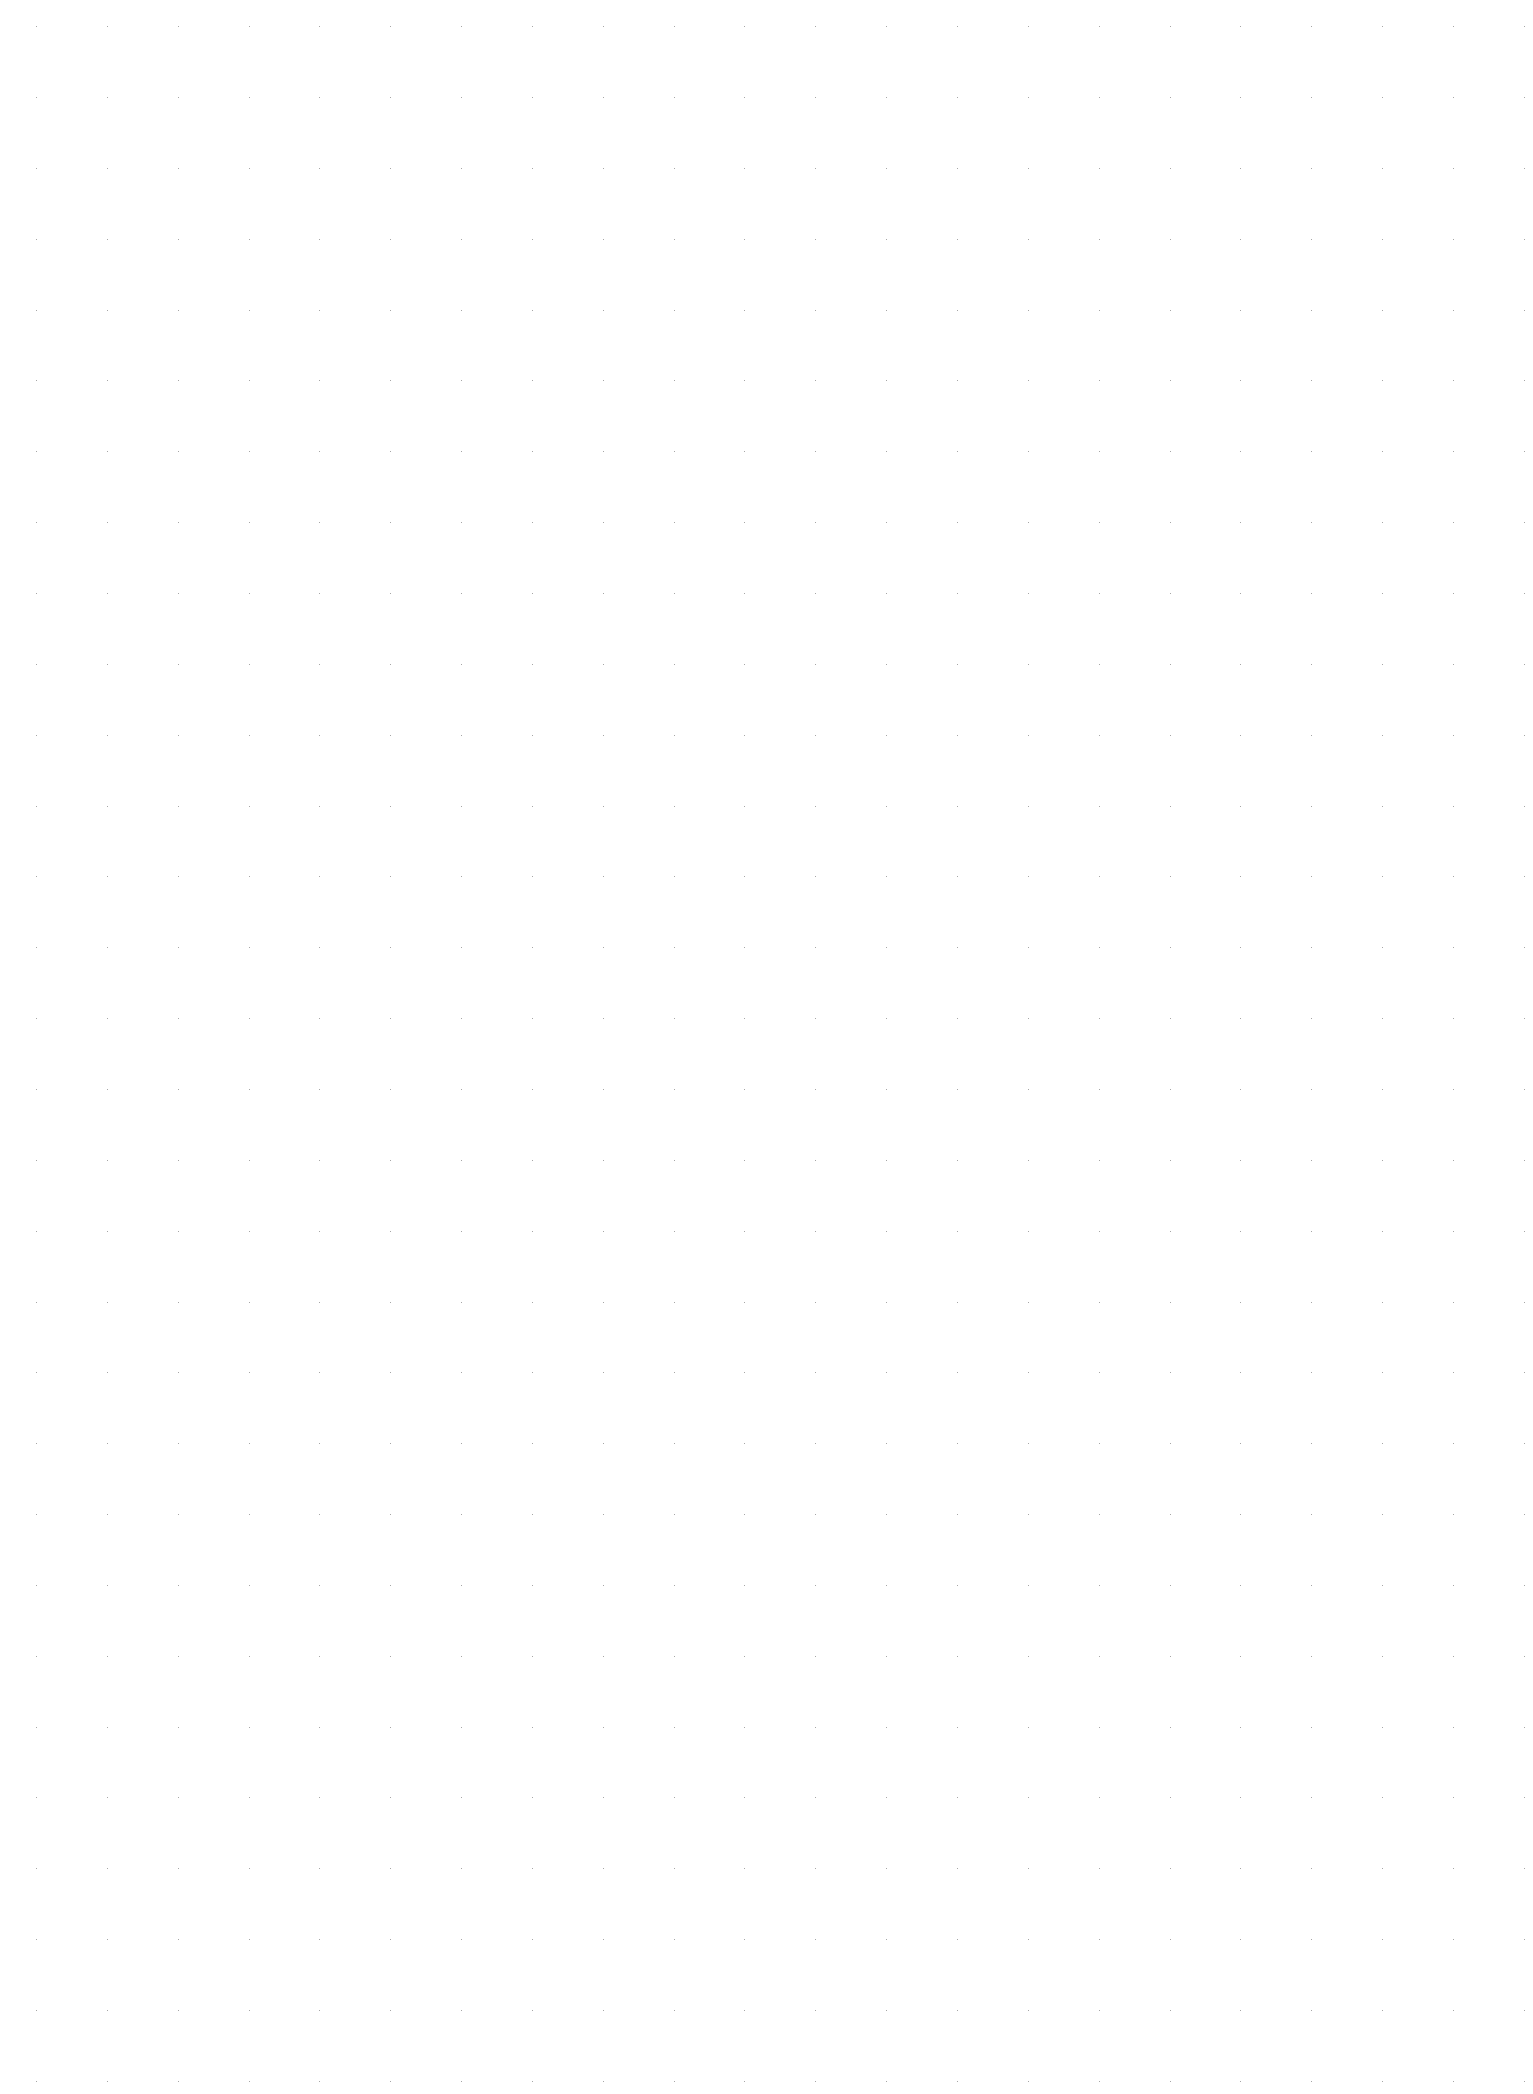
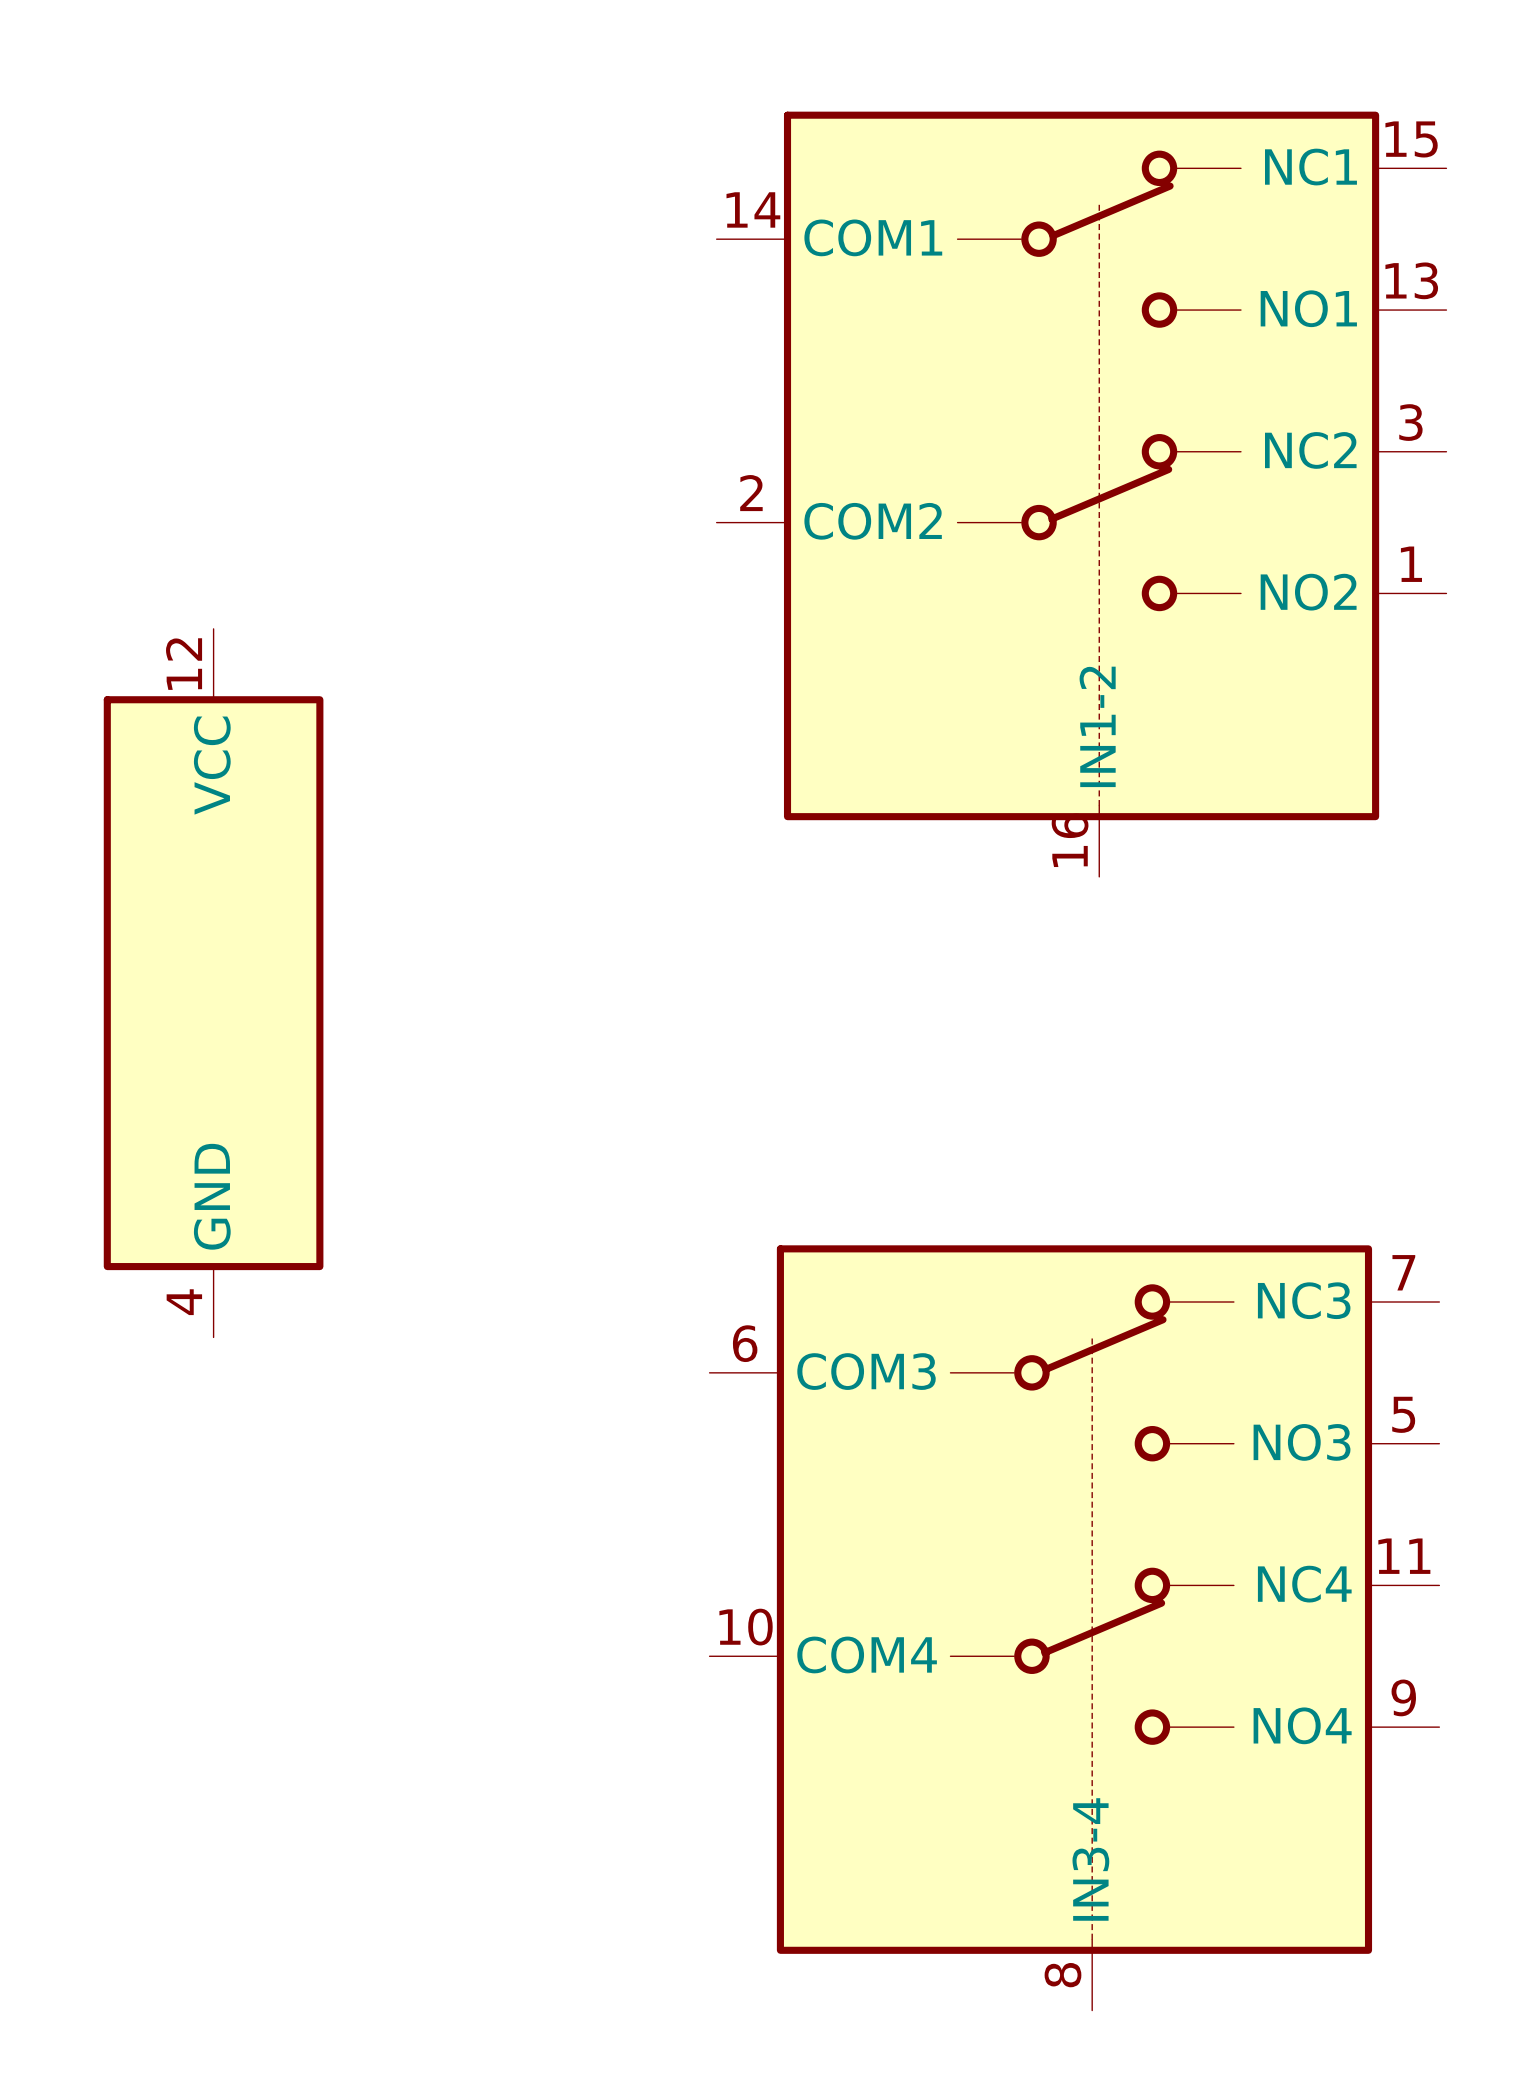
part: none -> (1081, 494)
part: none -> (213, 983)
part: none -> (1074, 1627)

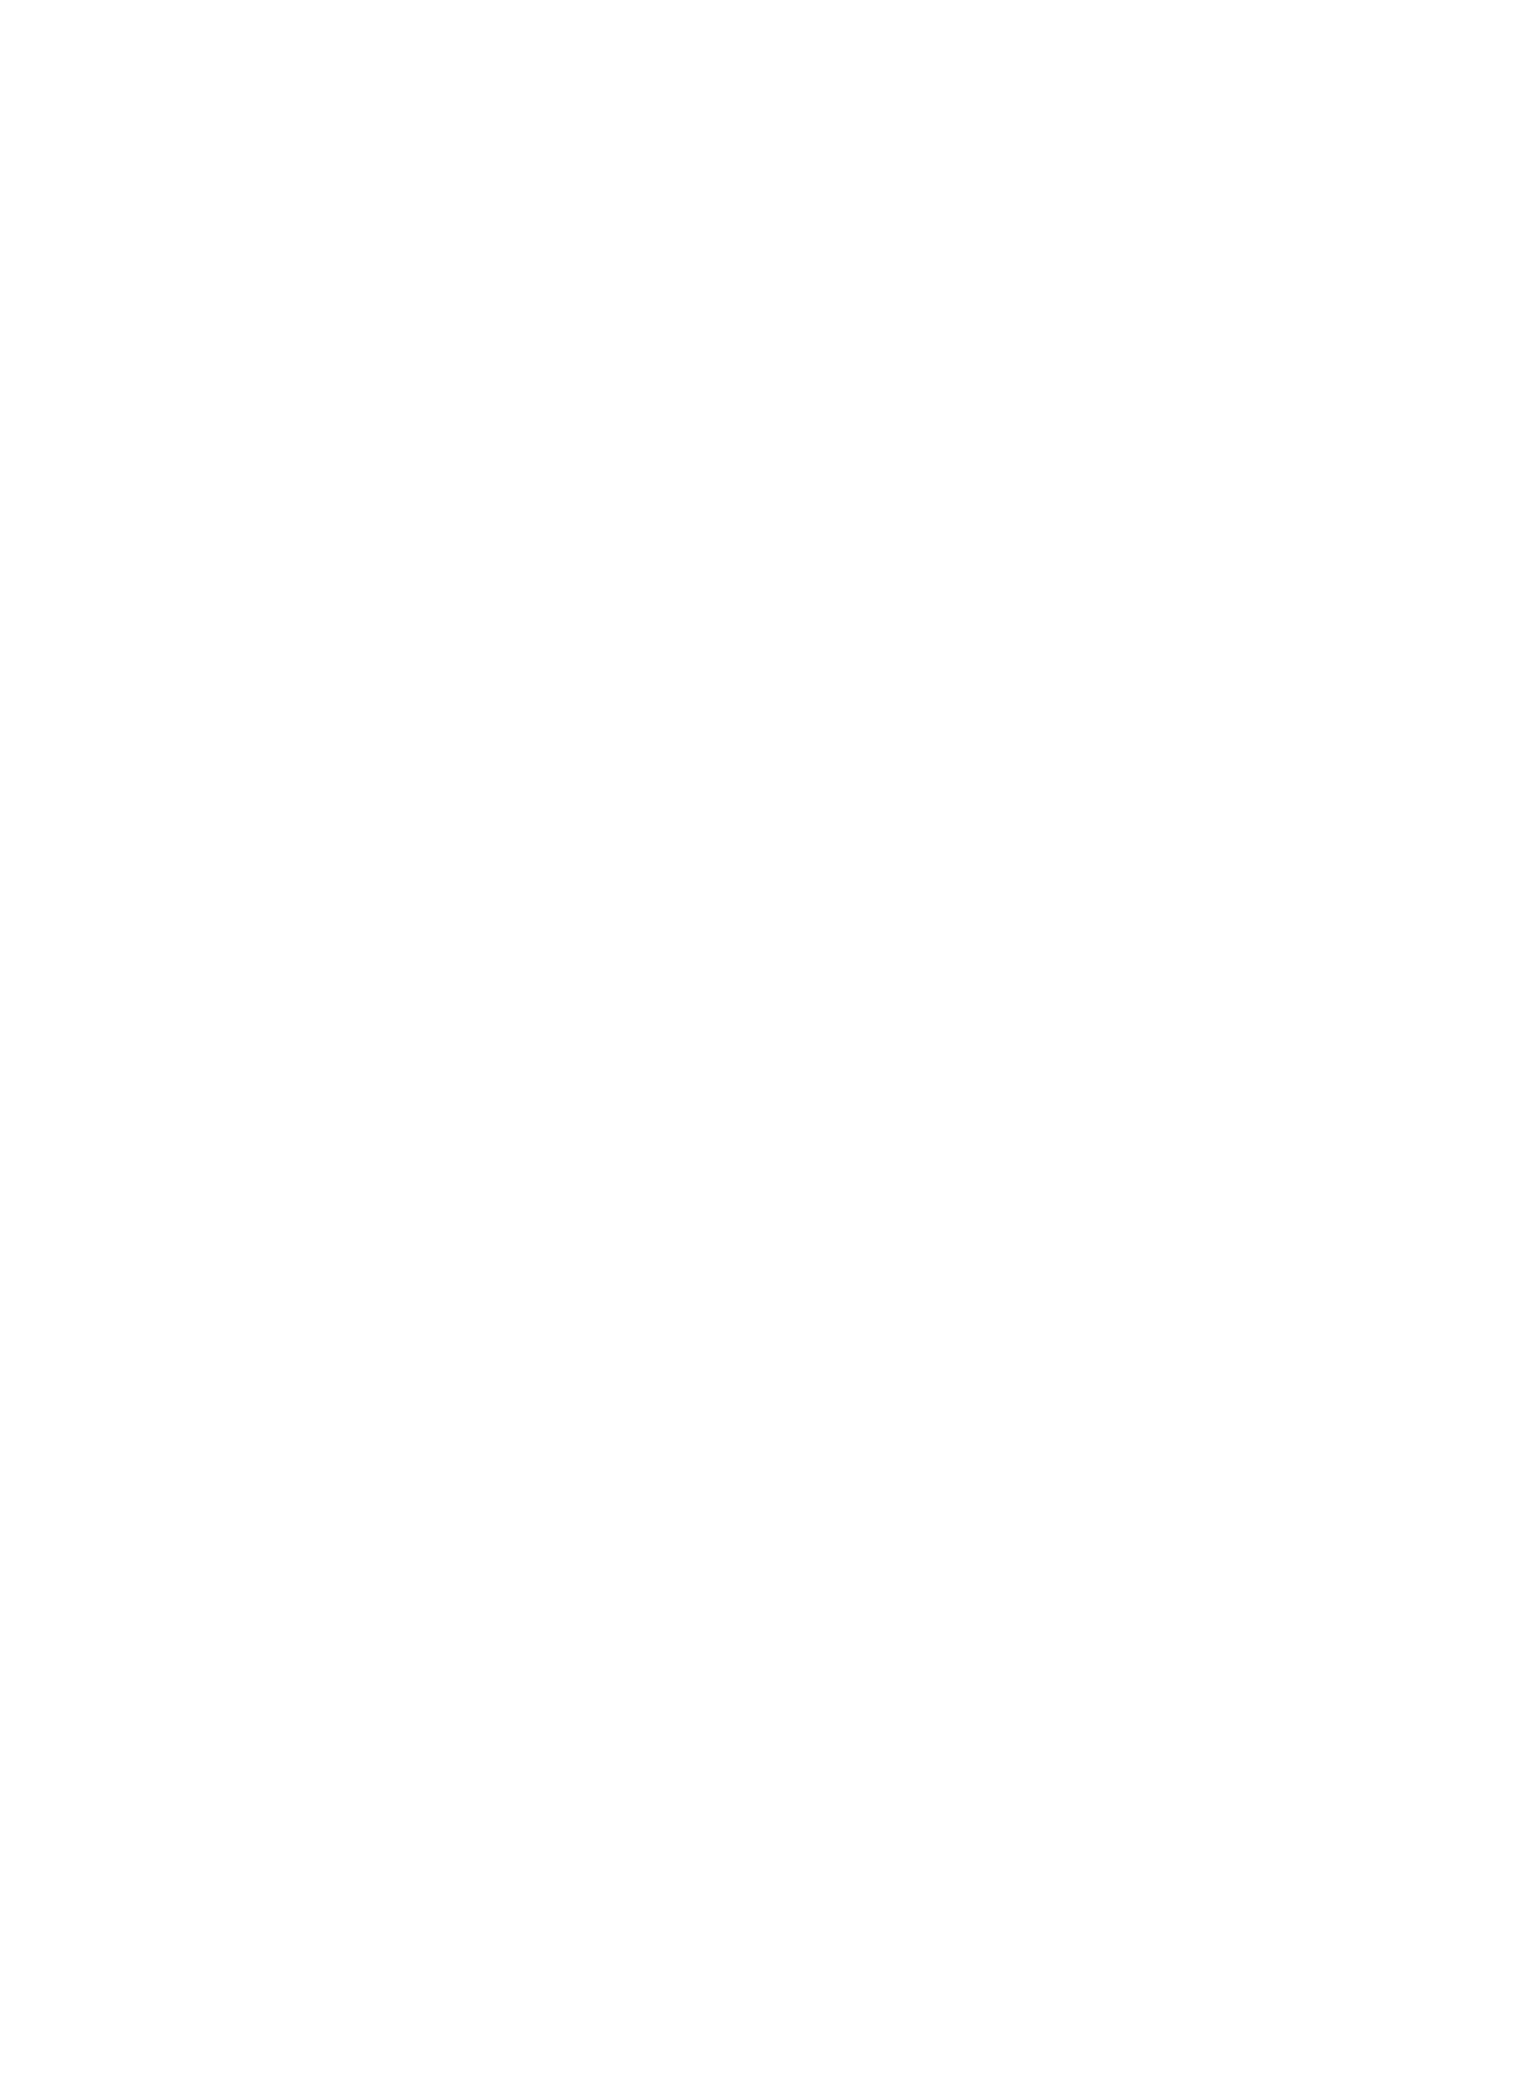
part: (1081, 494) -> none
part: (213, 983) -> none
part: (1074, 1627) -> none

